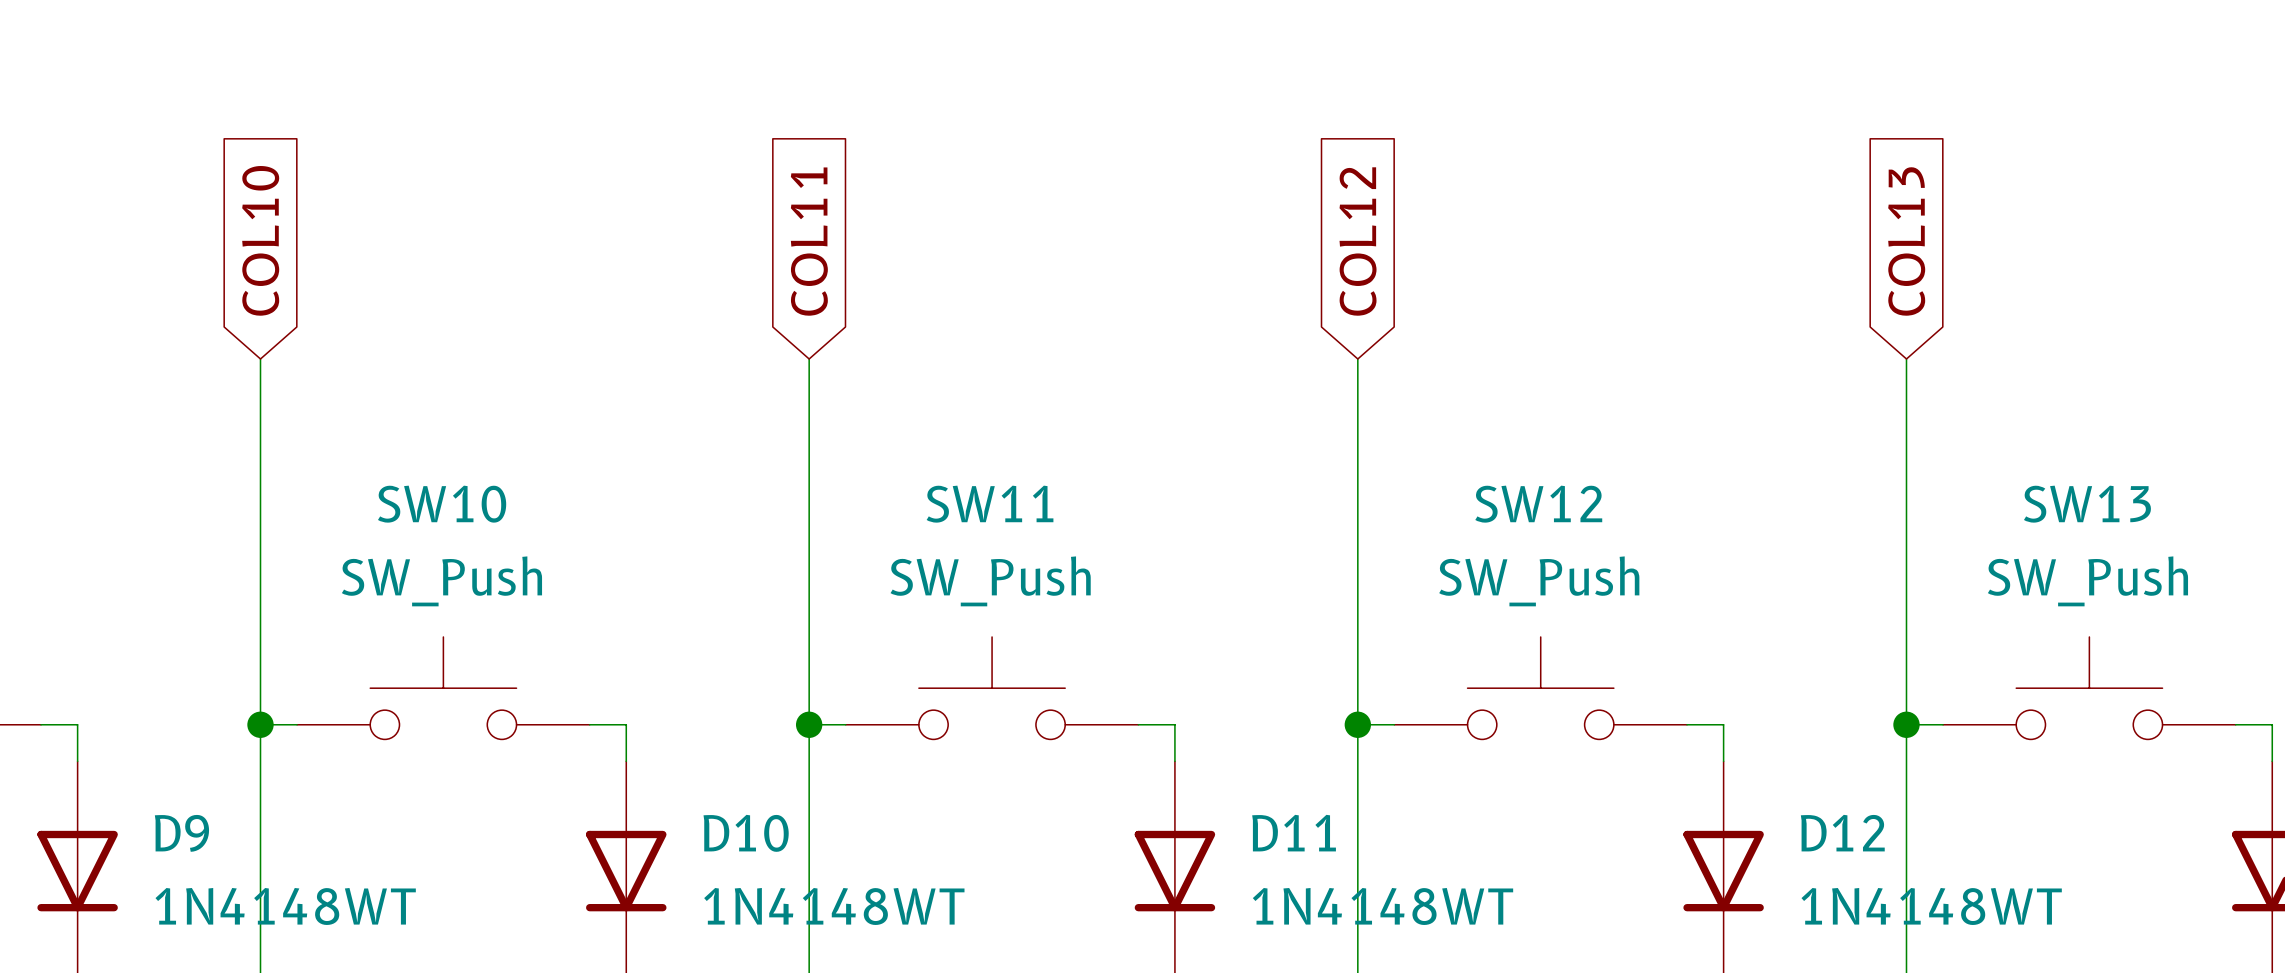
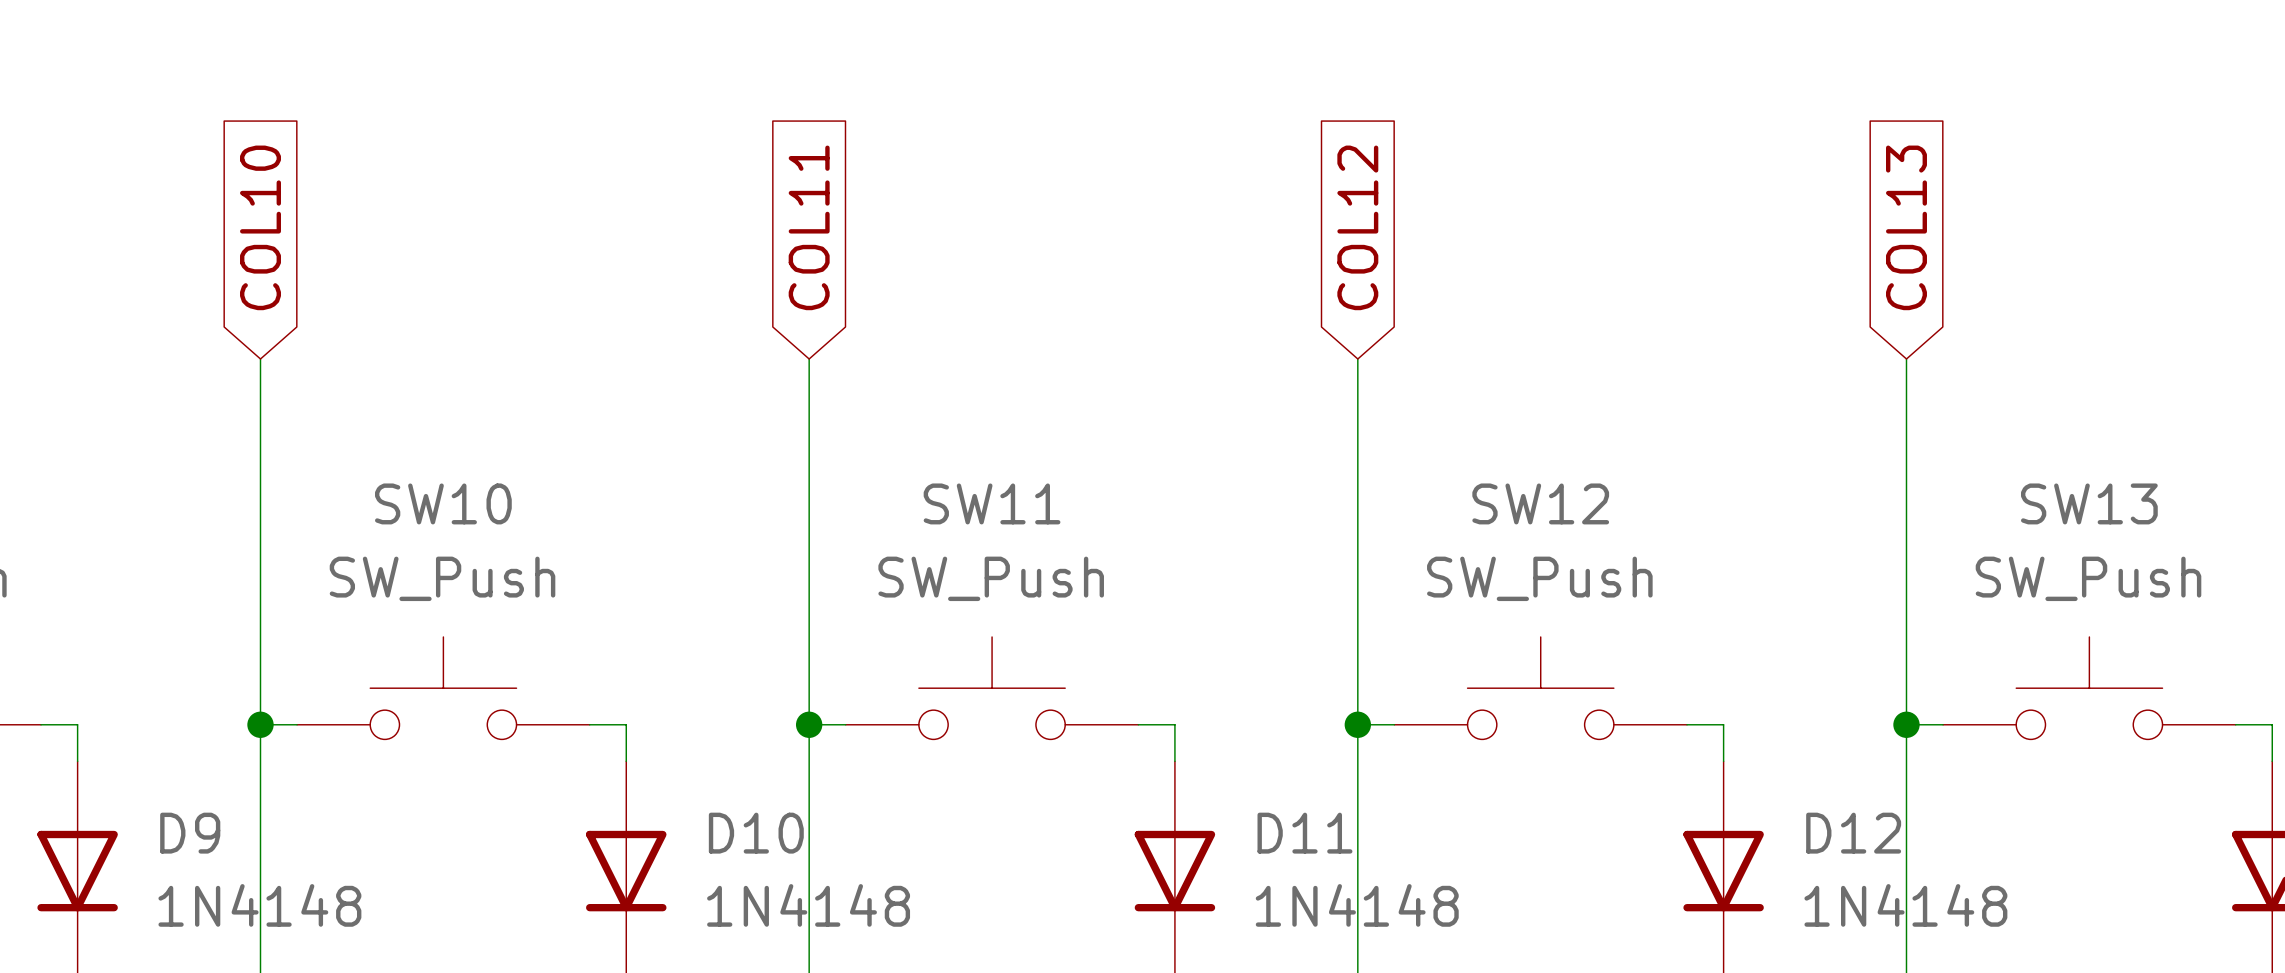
D9 value: 1N4148WT (285, 906) -> 1N4148 (259, 905)
D10 value: 1N4148WT (834, 906) -> 1N4148 (808, 905)
D11 value: 1N4148WT (1382, 906) -> 1N4148 (1357, 905)
D12 value: 1N4148WT (1931, 906) -> 1N4148 (1905, 905)

